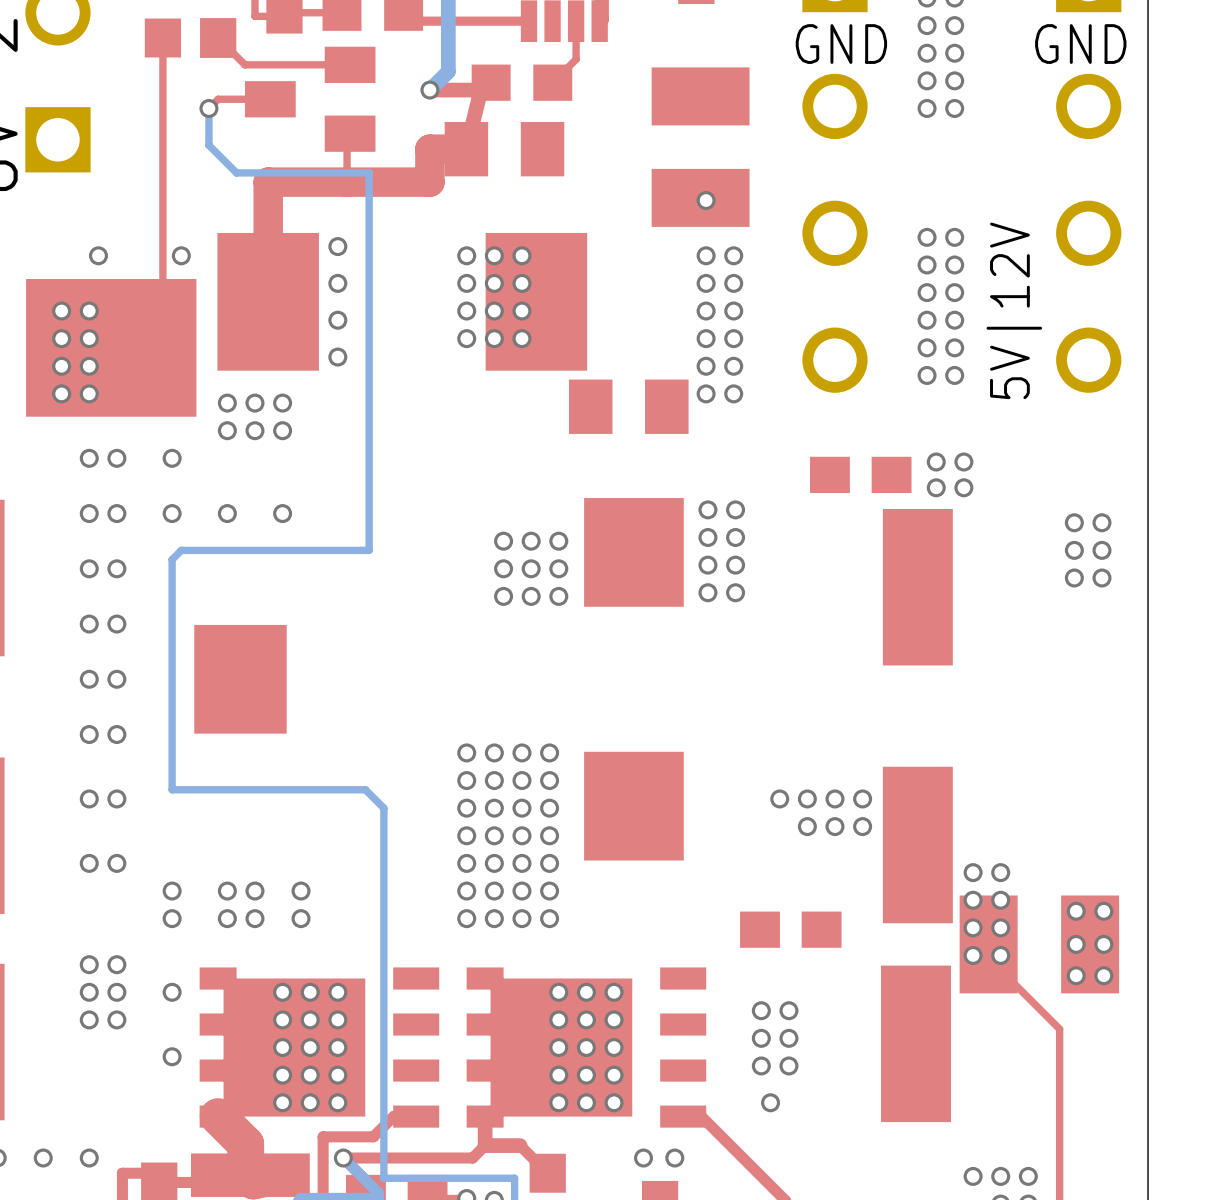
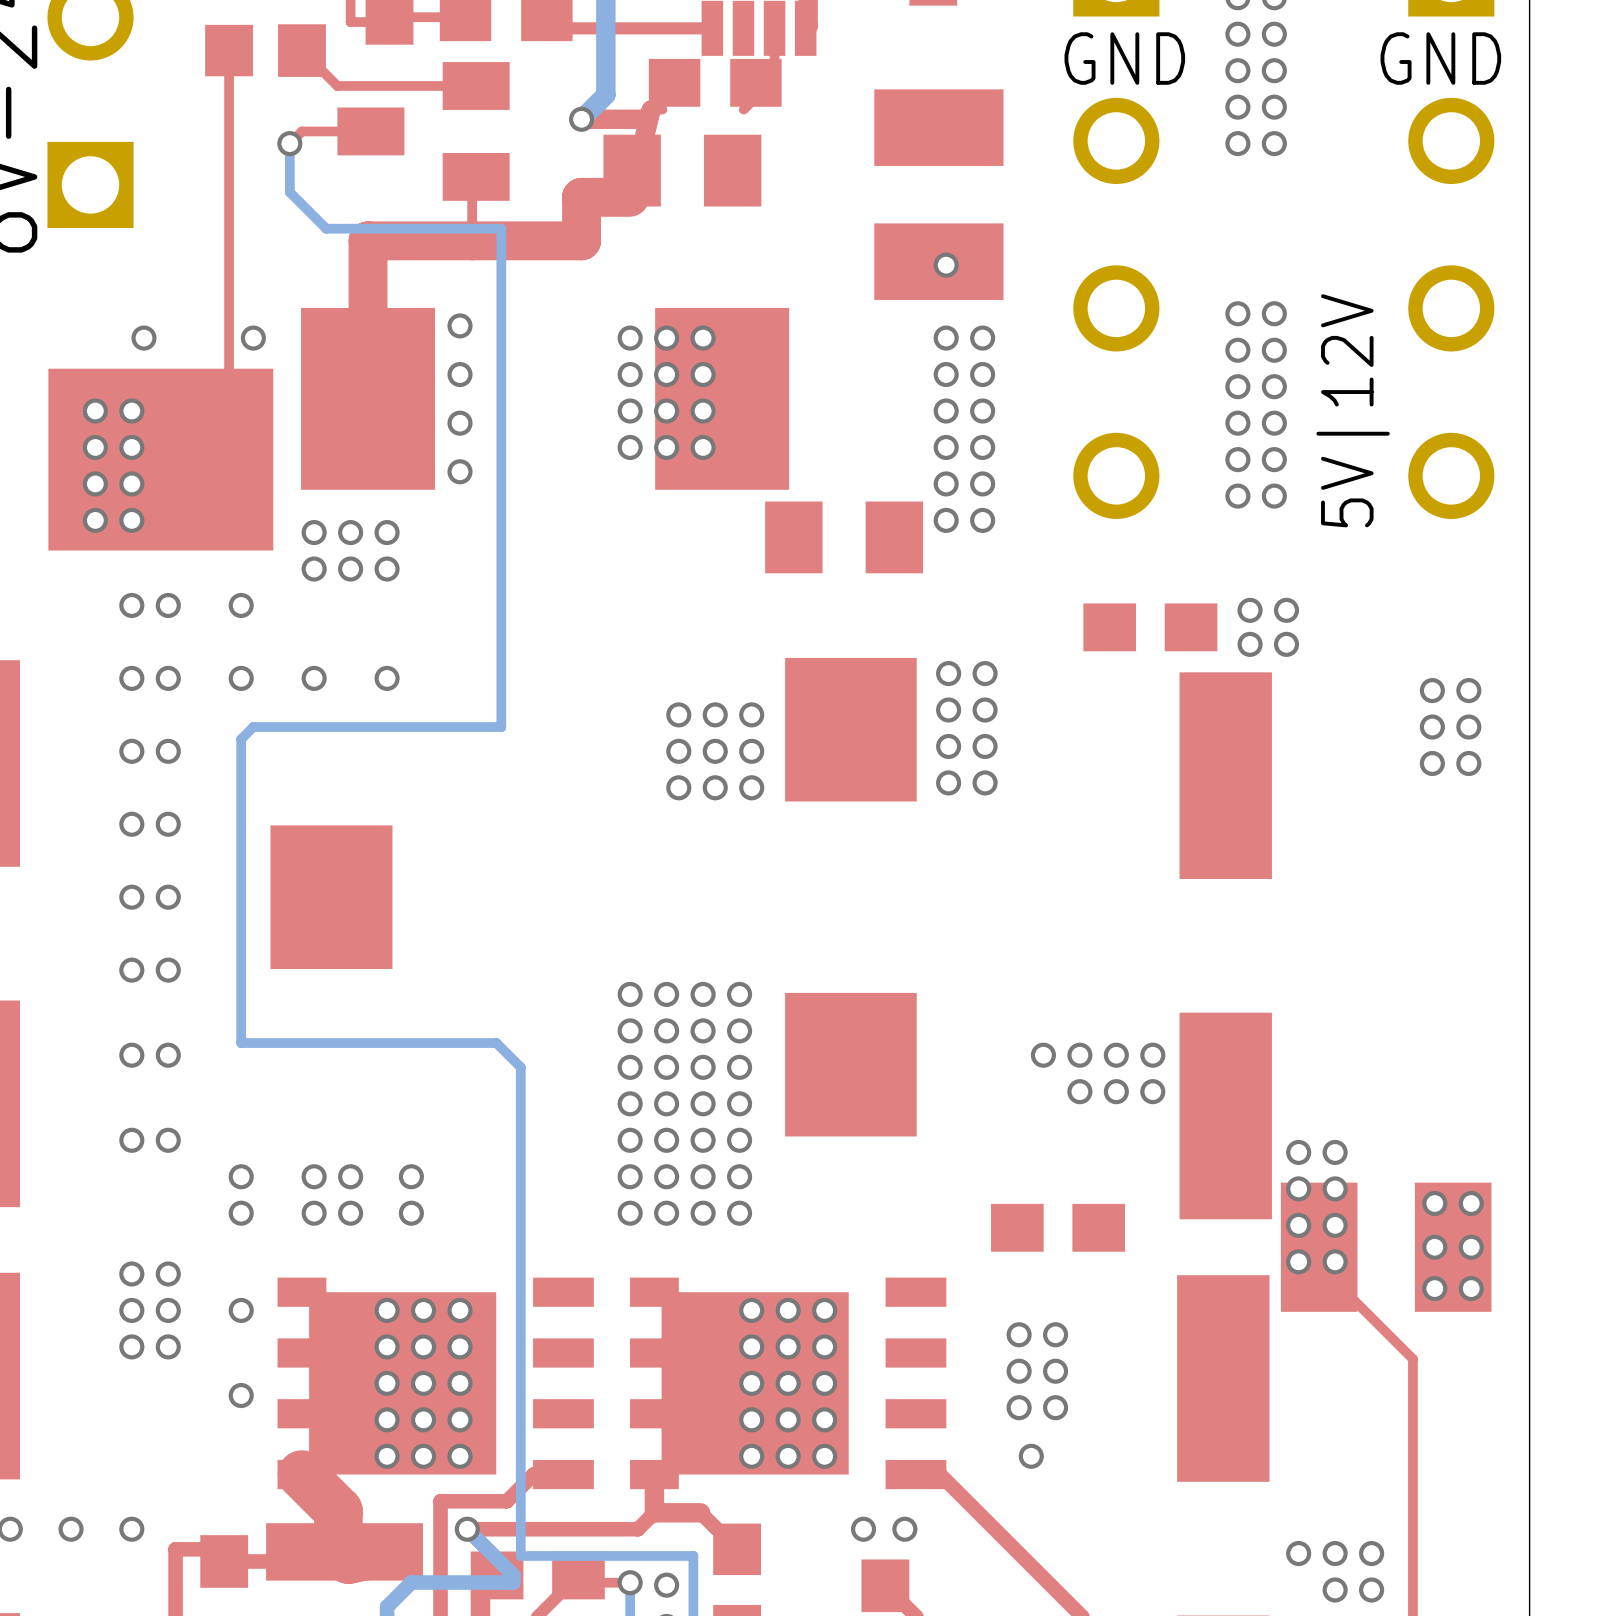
part position: (521, 82) -> (715, 82)
part position: (504, 149) -> (682, 170)

